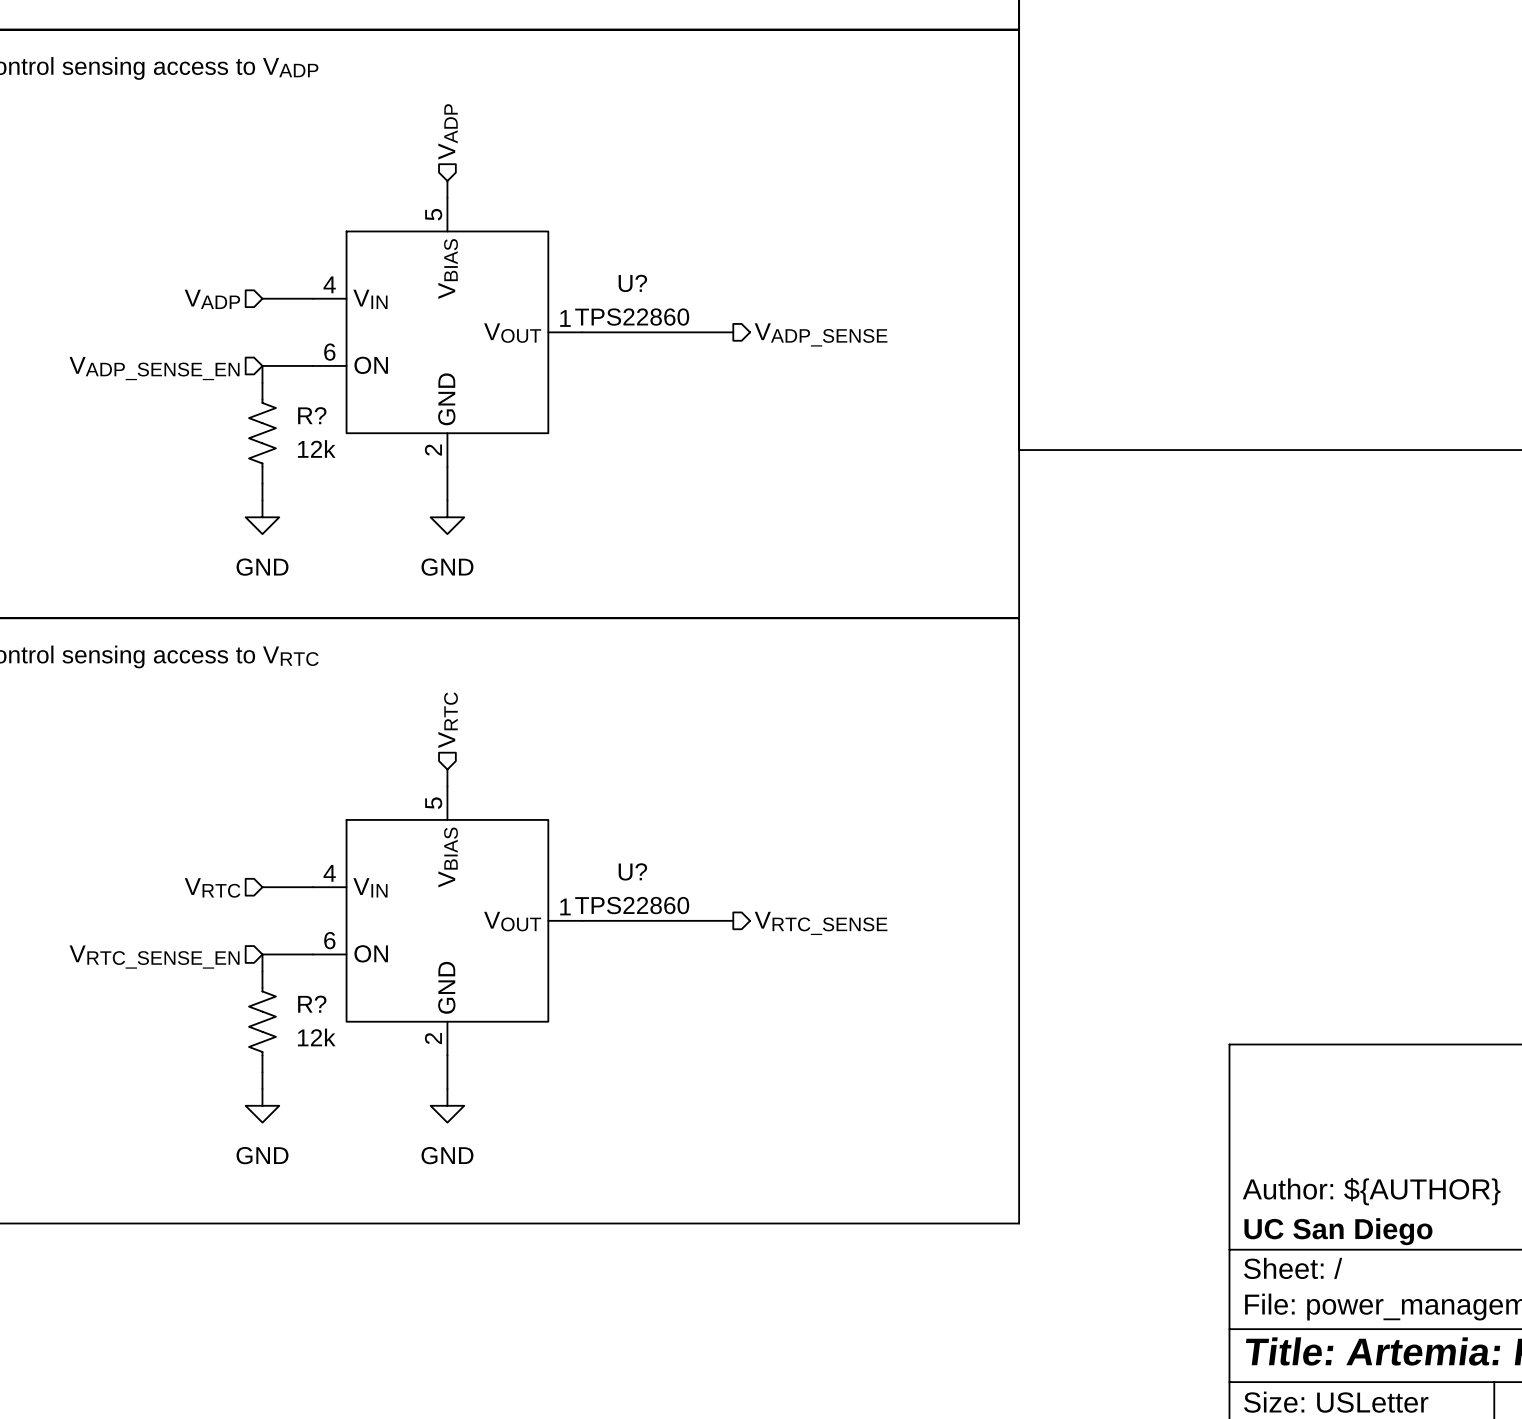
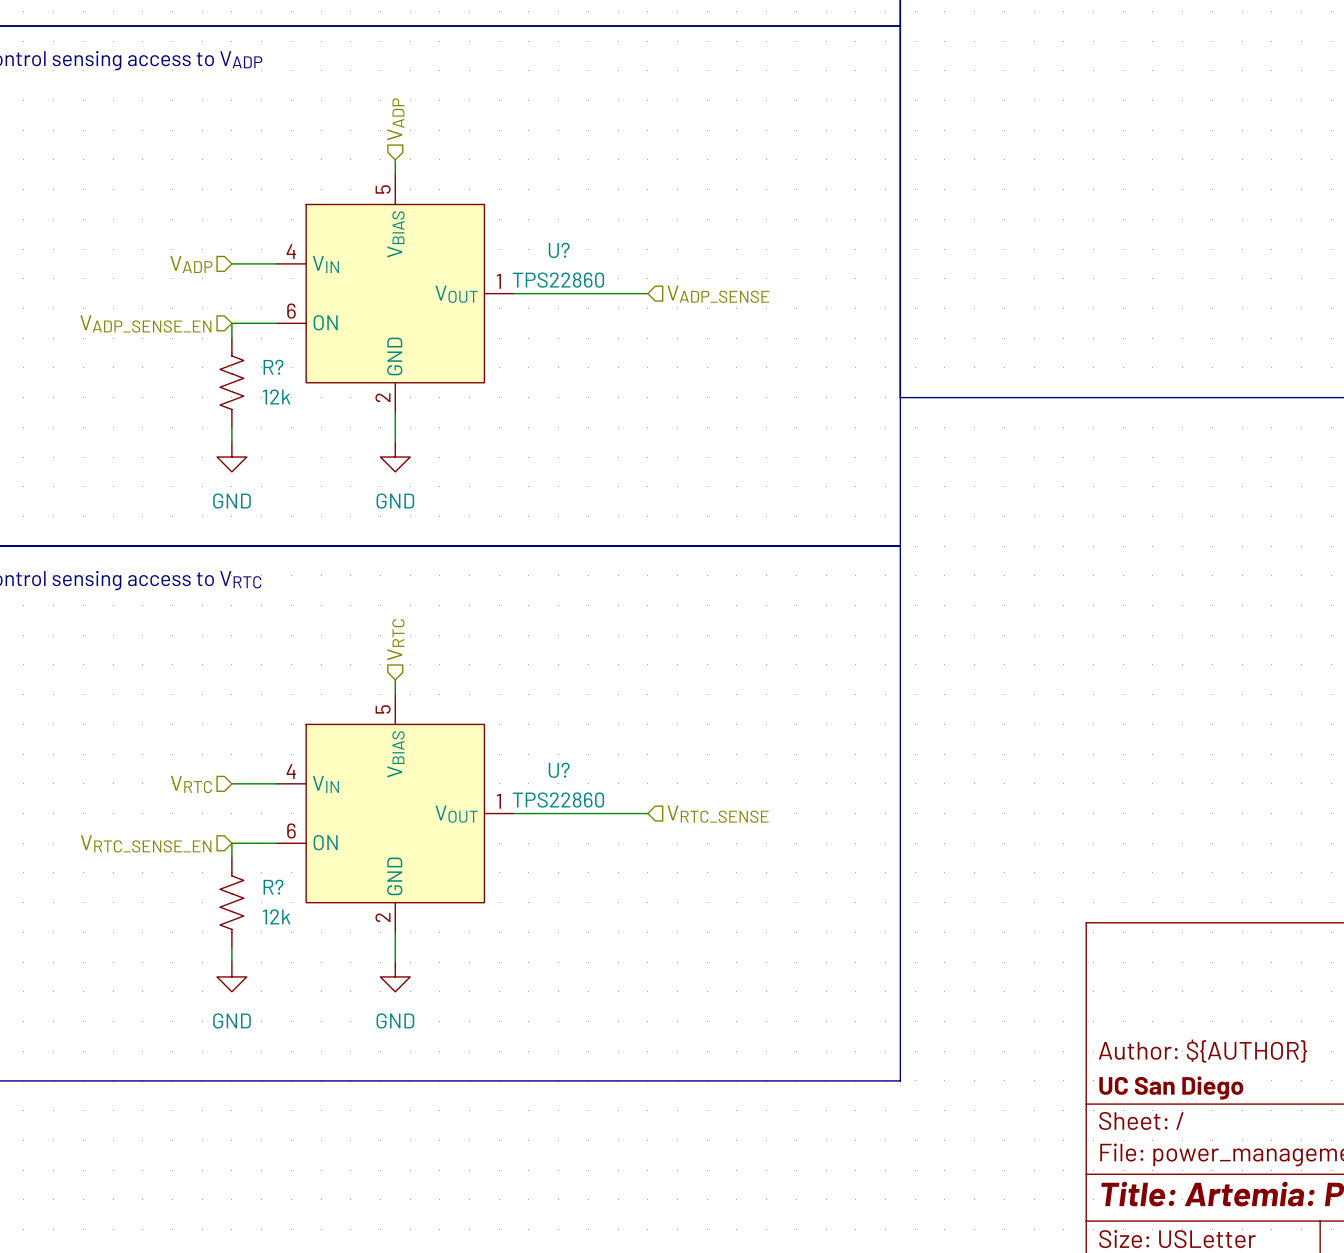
hierarchical label shape: output (821, 334) -> input (718, 294)
hierarchical label shape: output (821, 923) -> input (718, 814)

